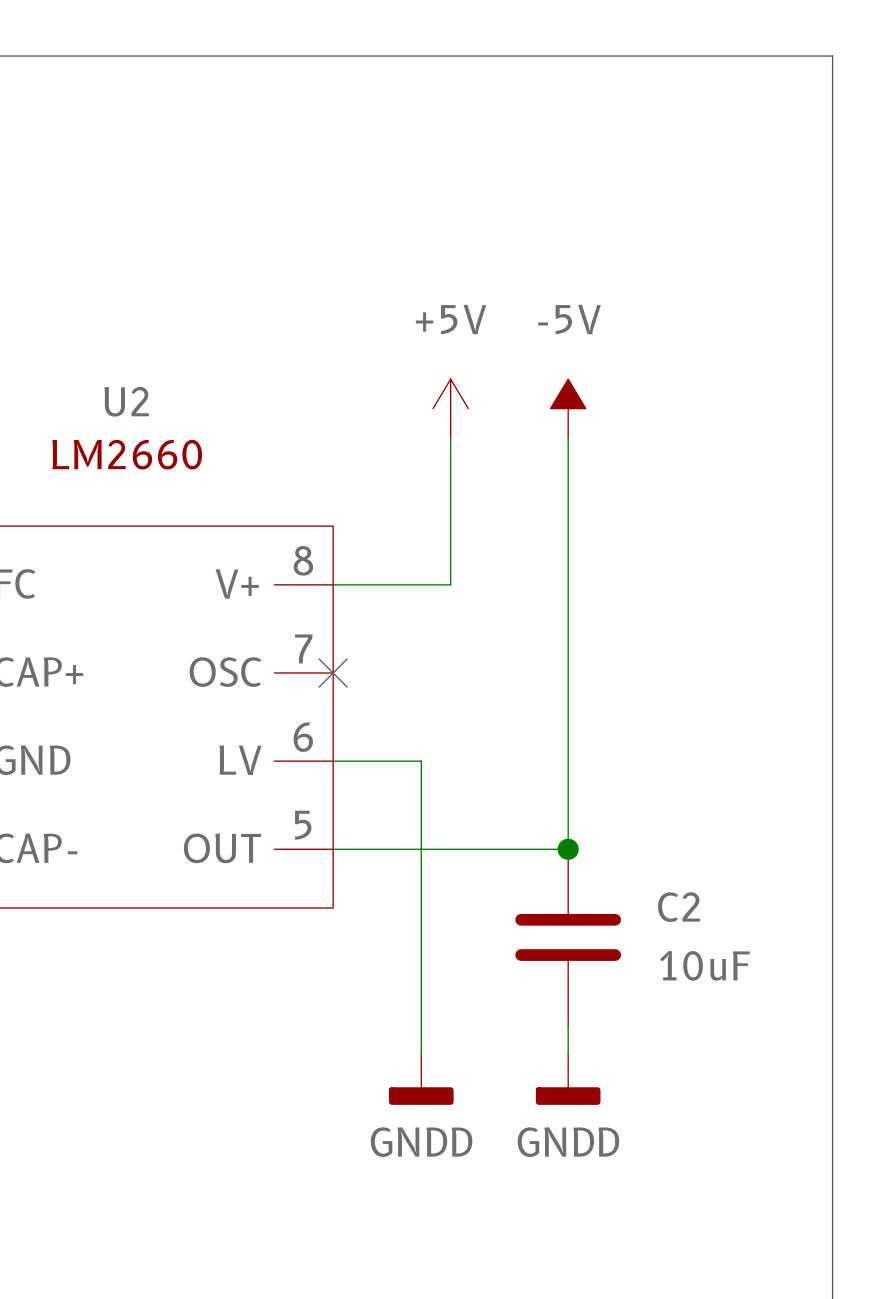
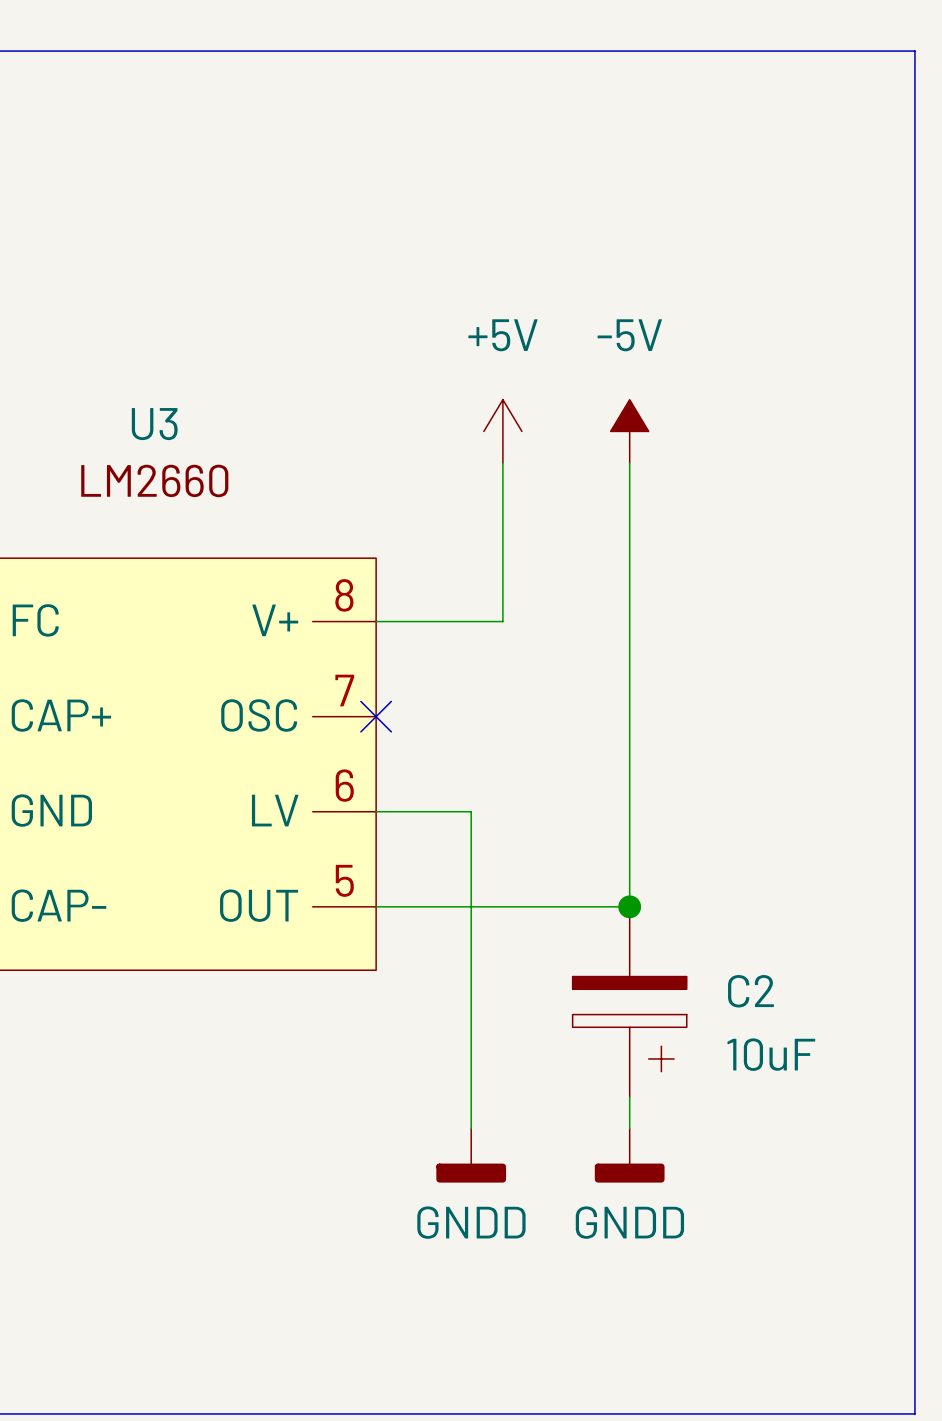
U2 name: U2 (126, 401) -> U3 (154, 424)
C2 symbol: [515, 849, 622, 1026] -> [572, 906, 687, 1098]

